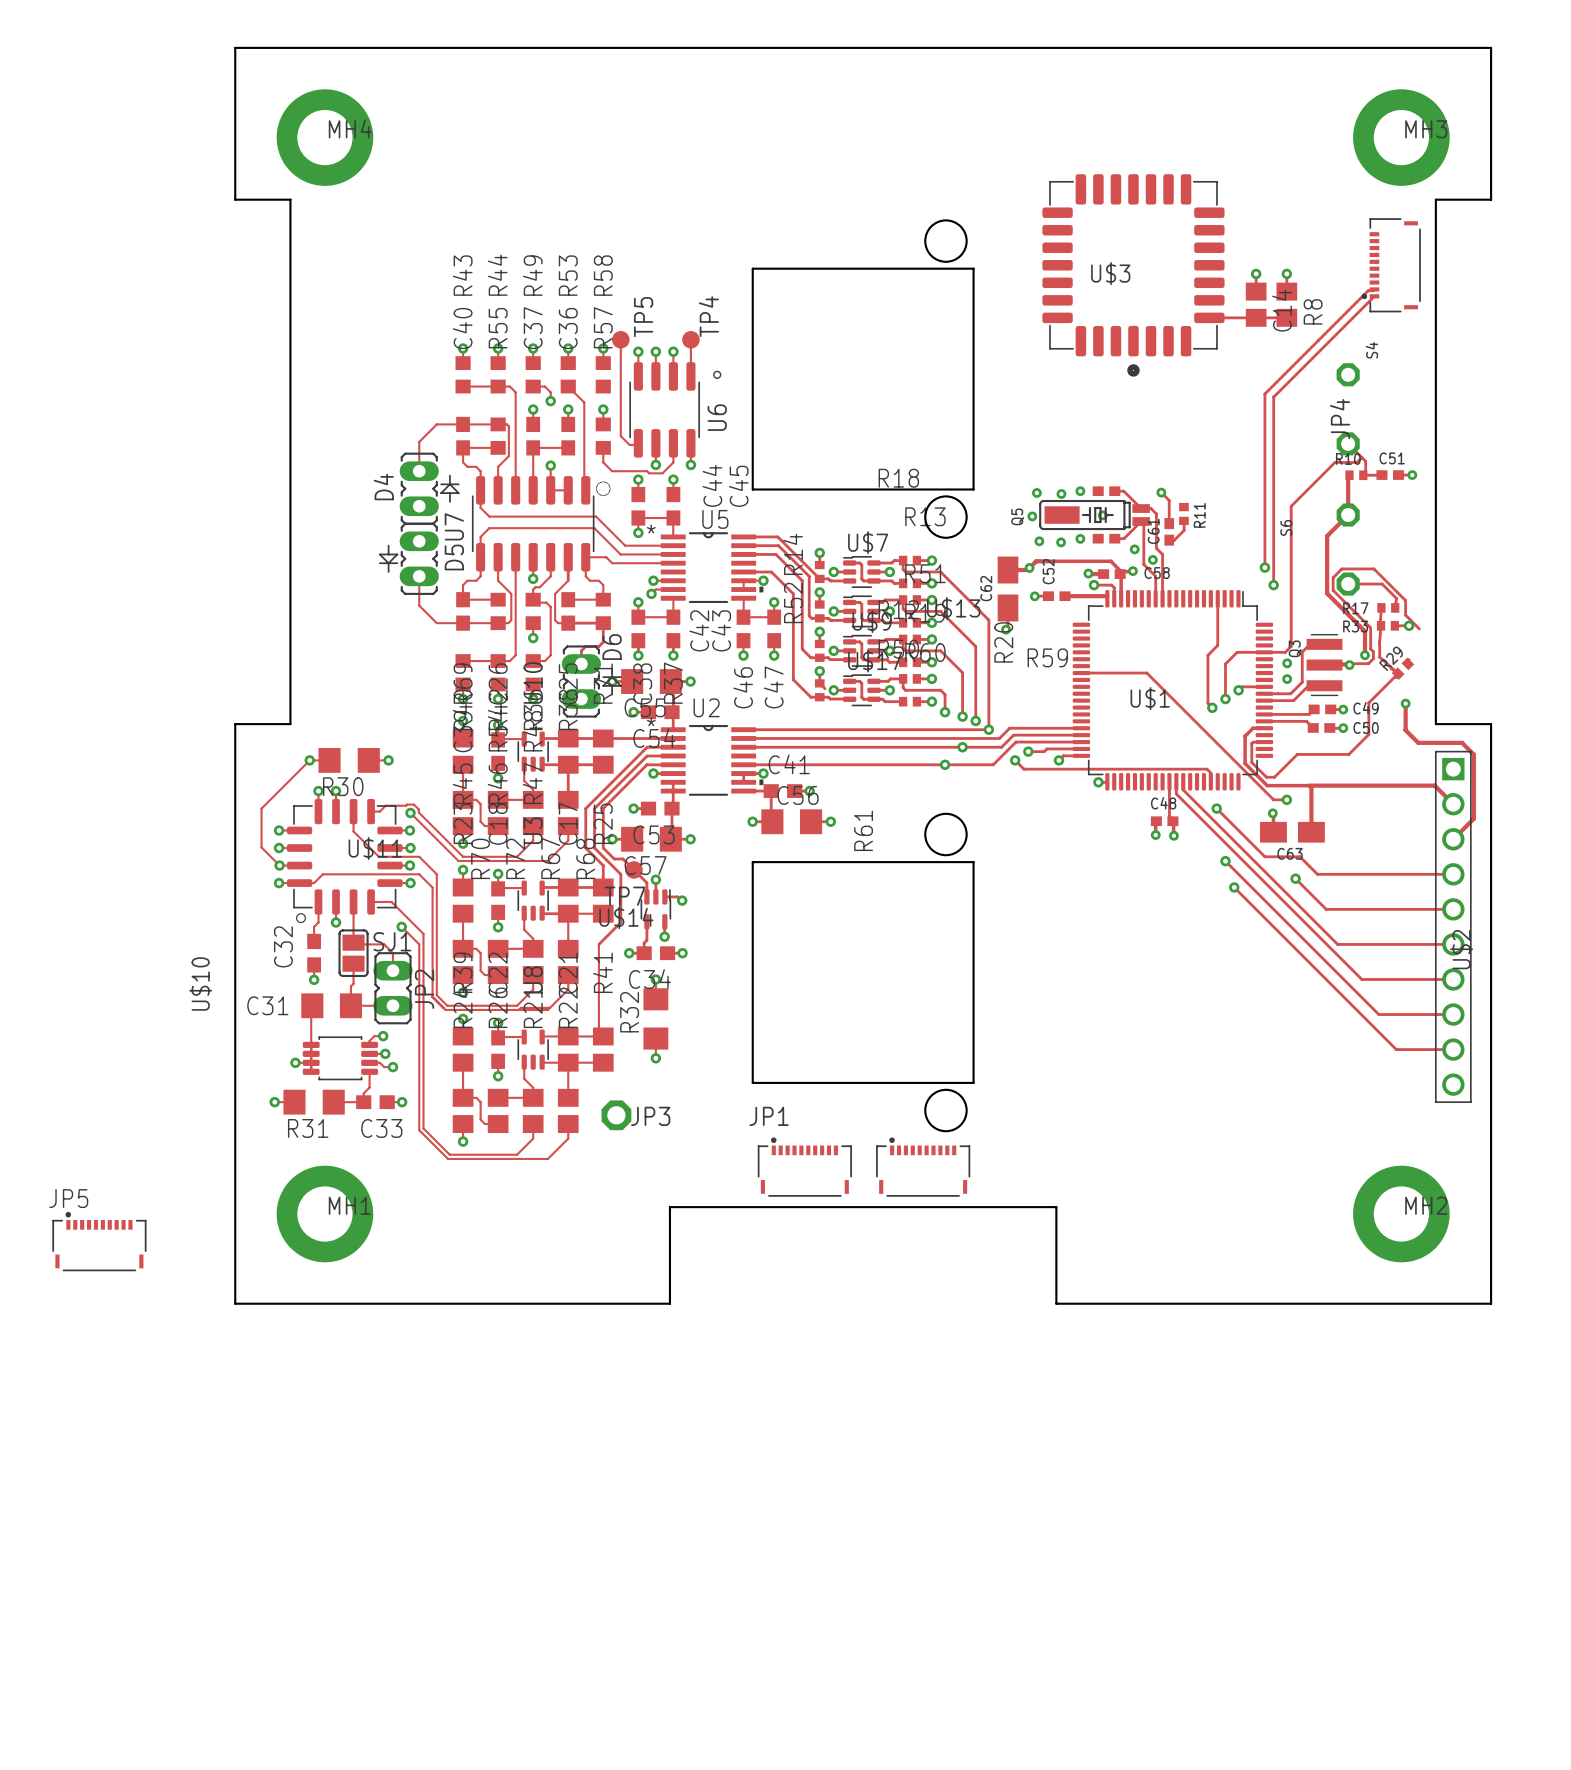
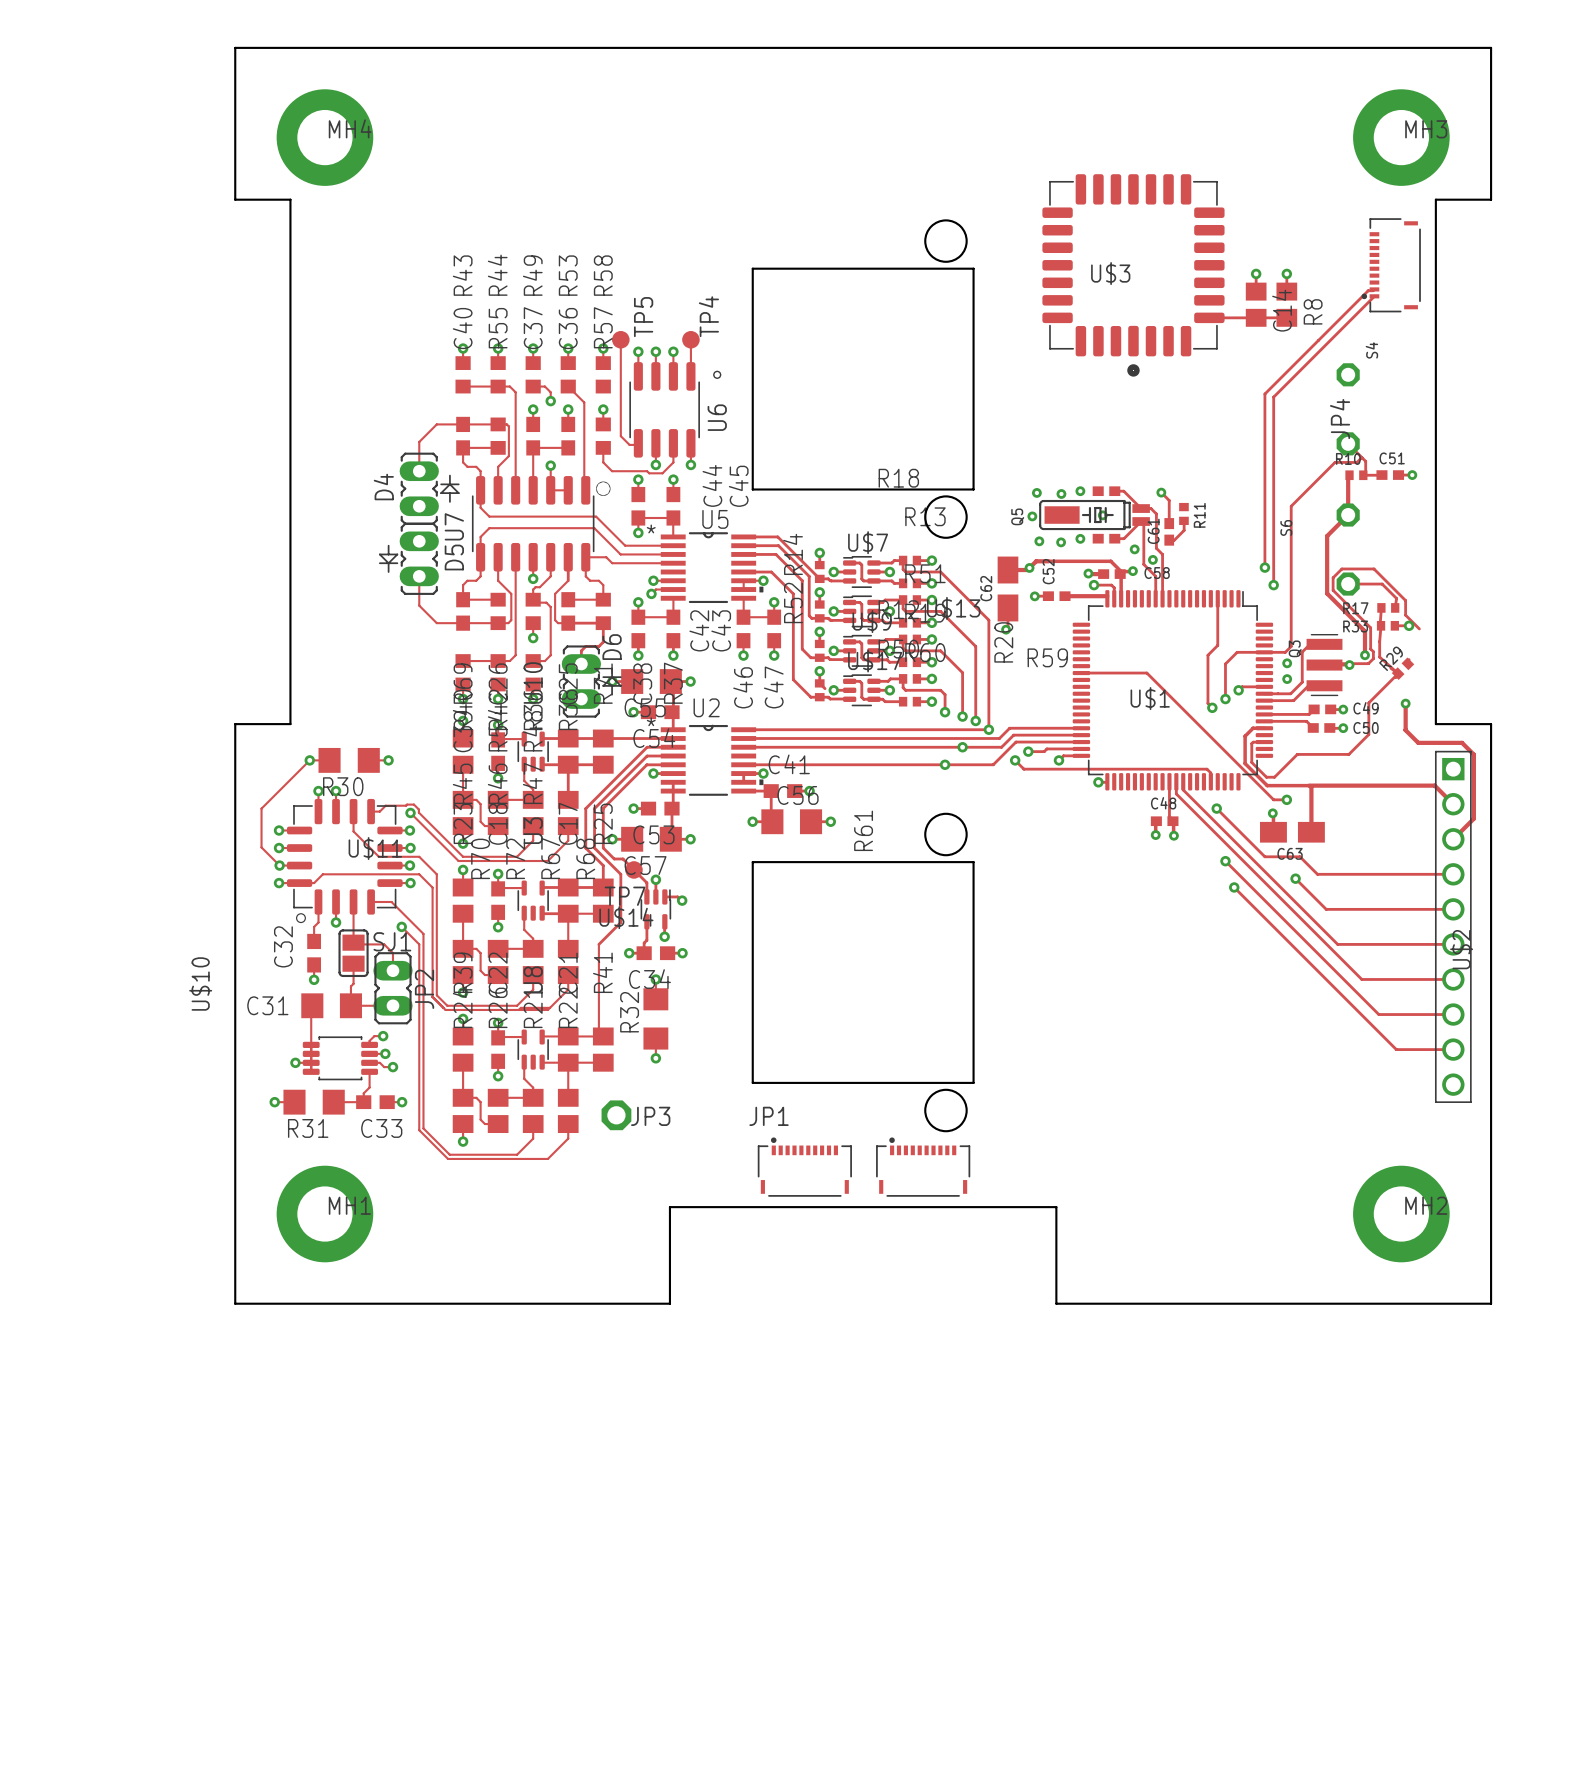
JP5: (99, 1241) -> none

